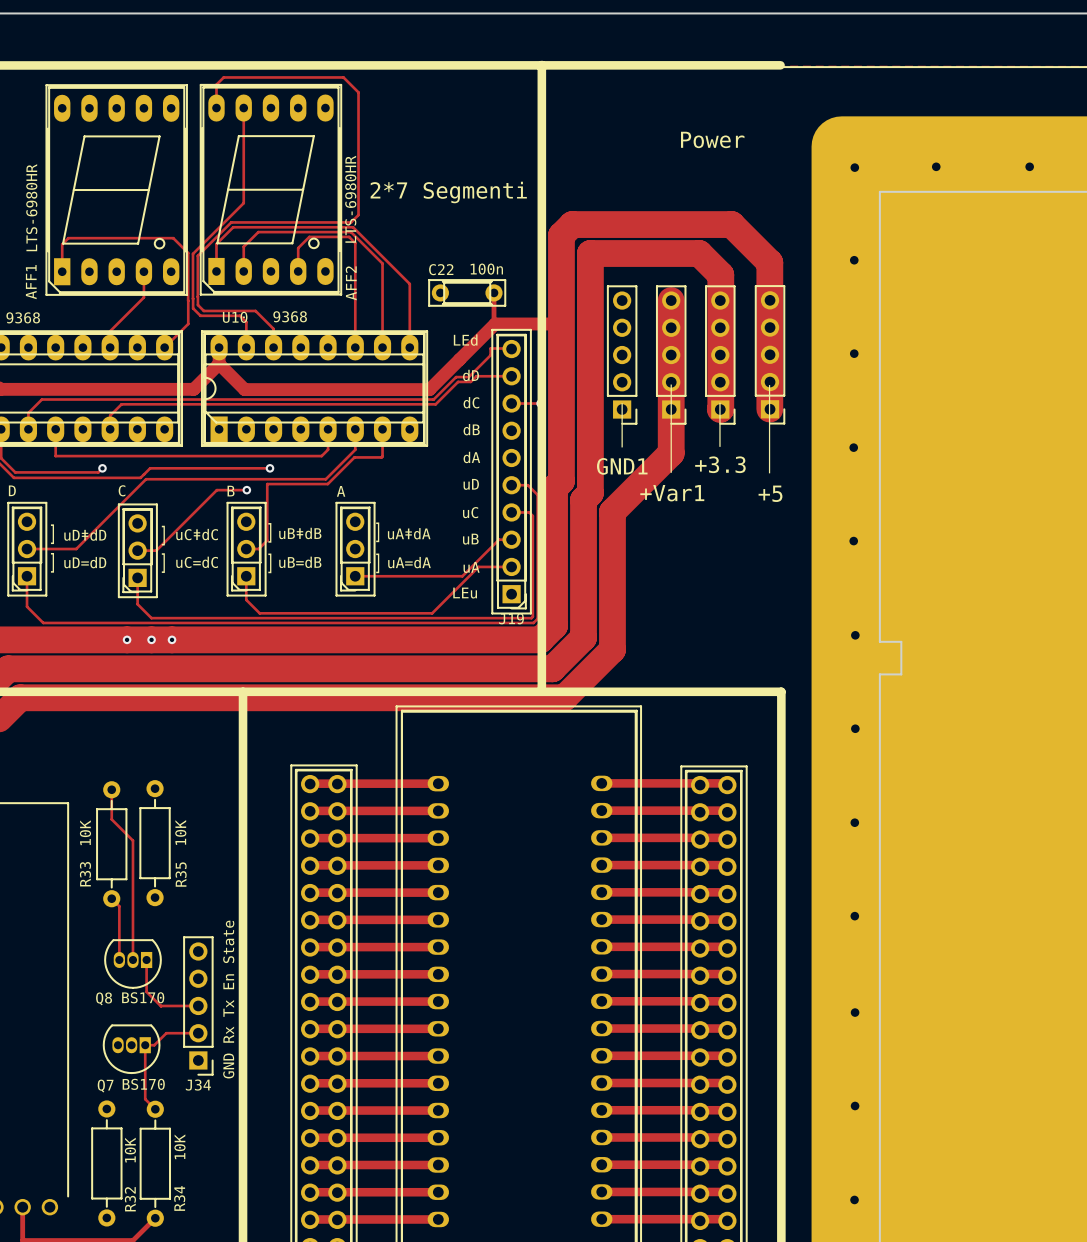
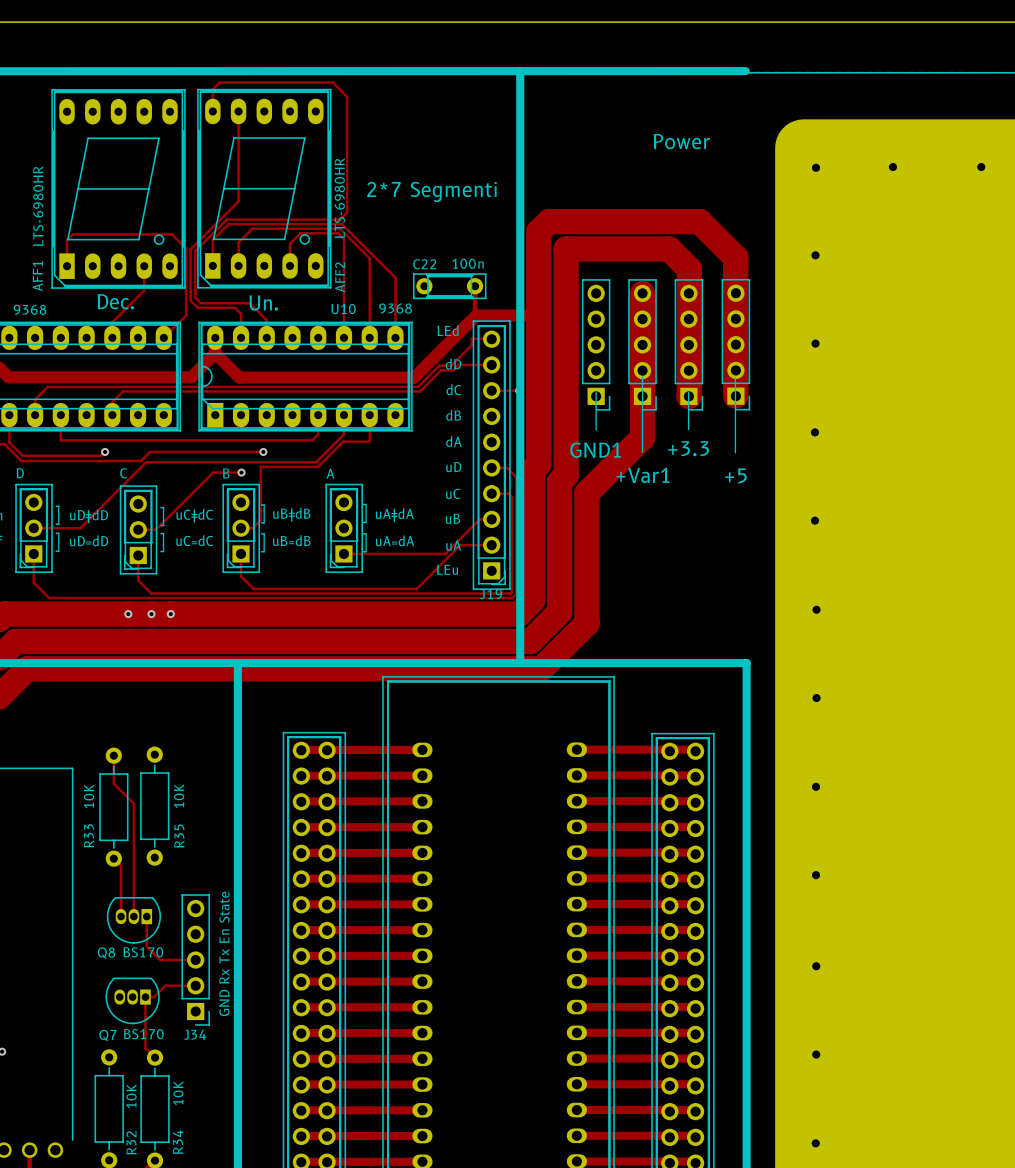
AFF1 text: none -> Dec. (115, 301)
AFF2 text: none -> Un. (263, 302)
U10 value position: 9368 (290, 316) -> 9368 (395, 308)
U10 name position: U10 (235, 317) -> U10 (343, 309)

